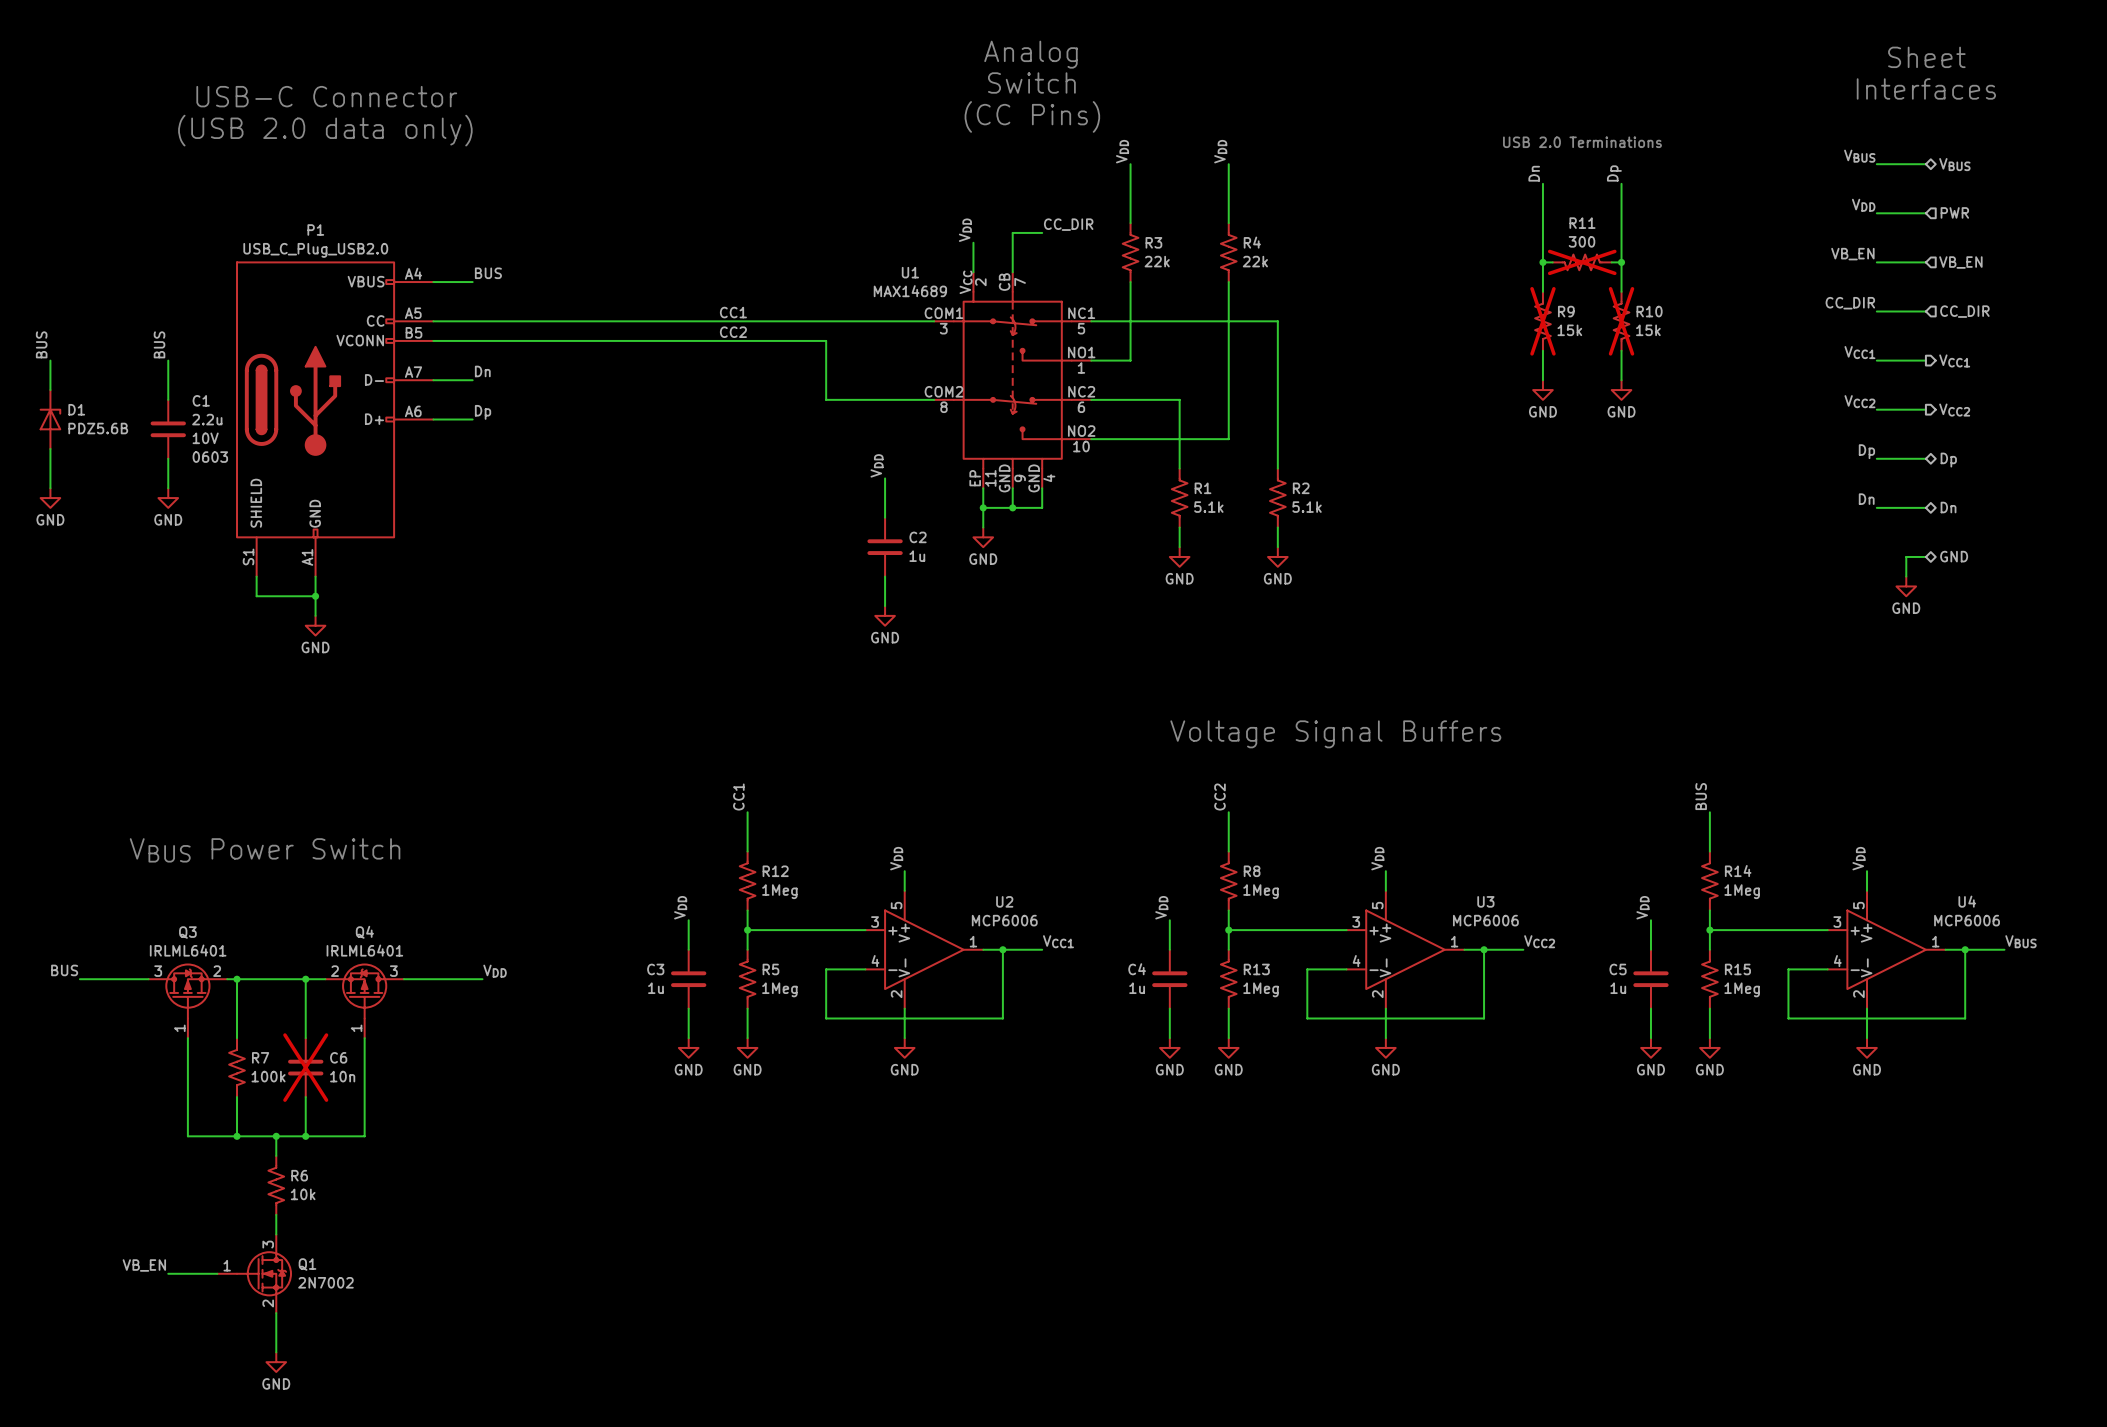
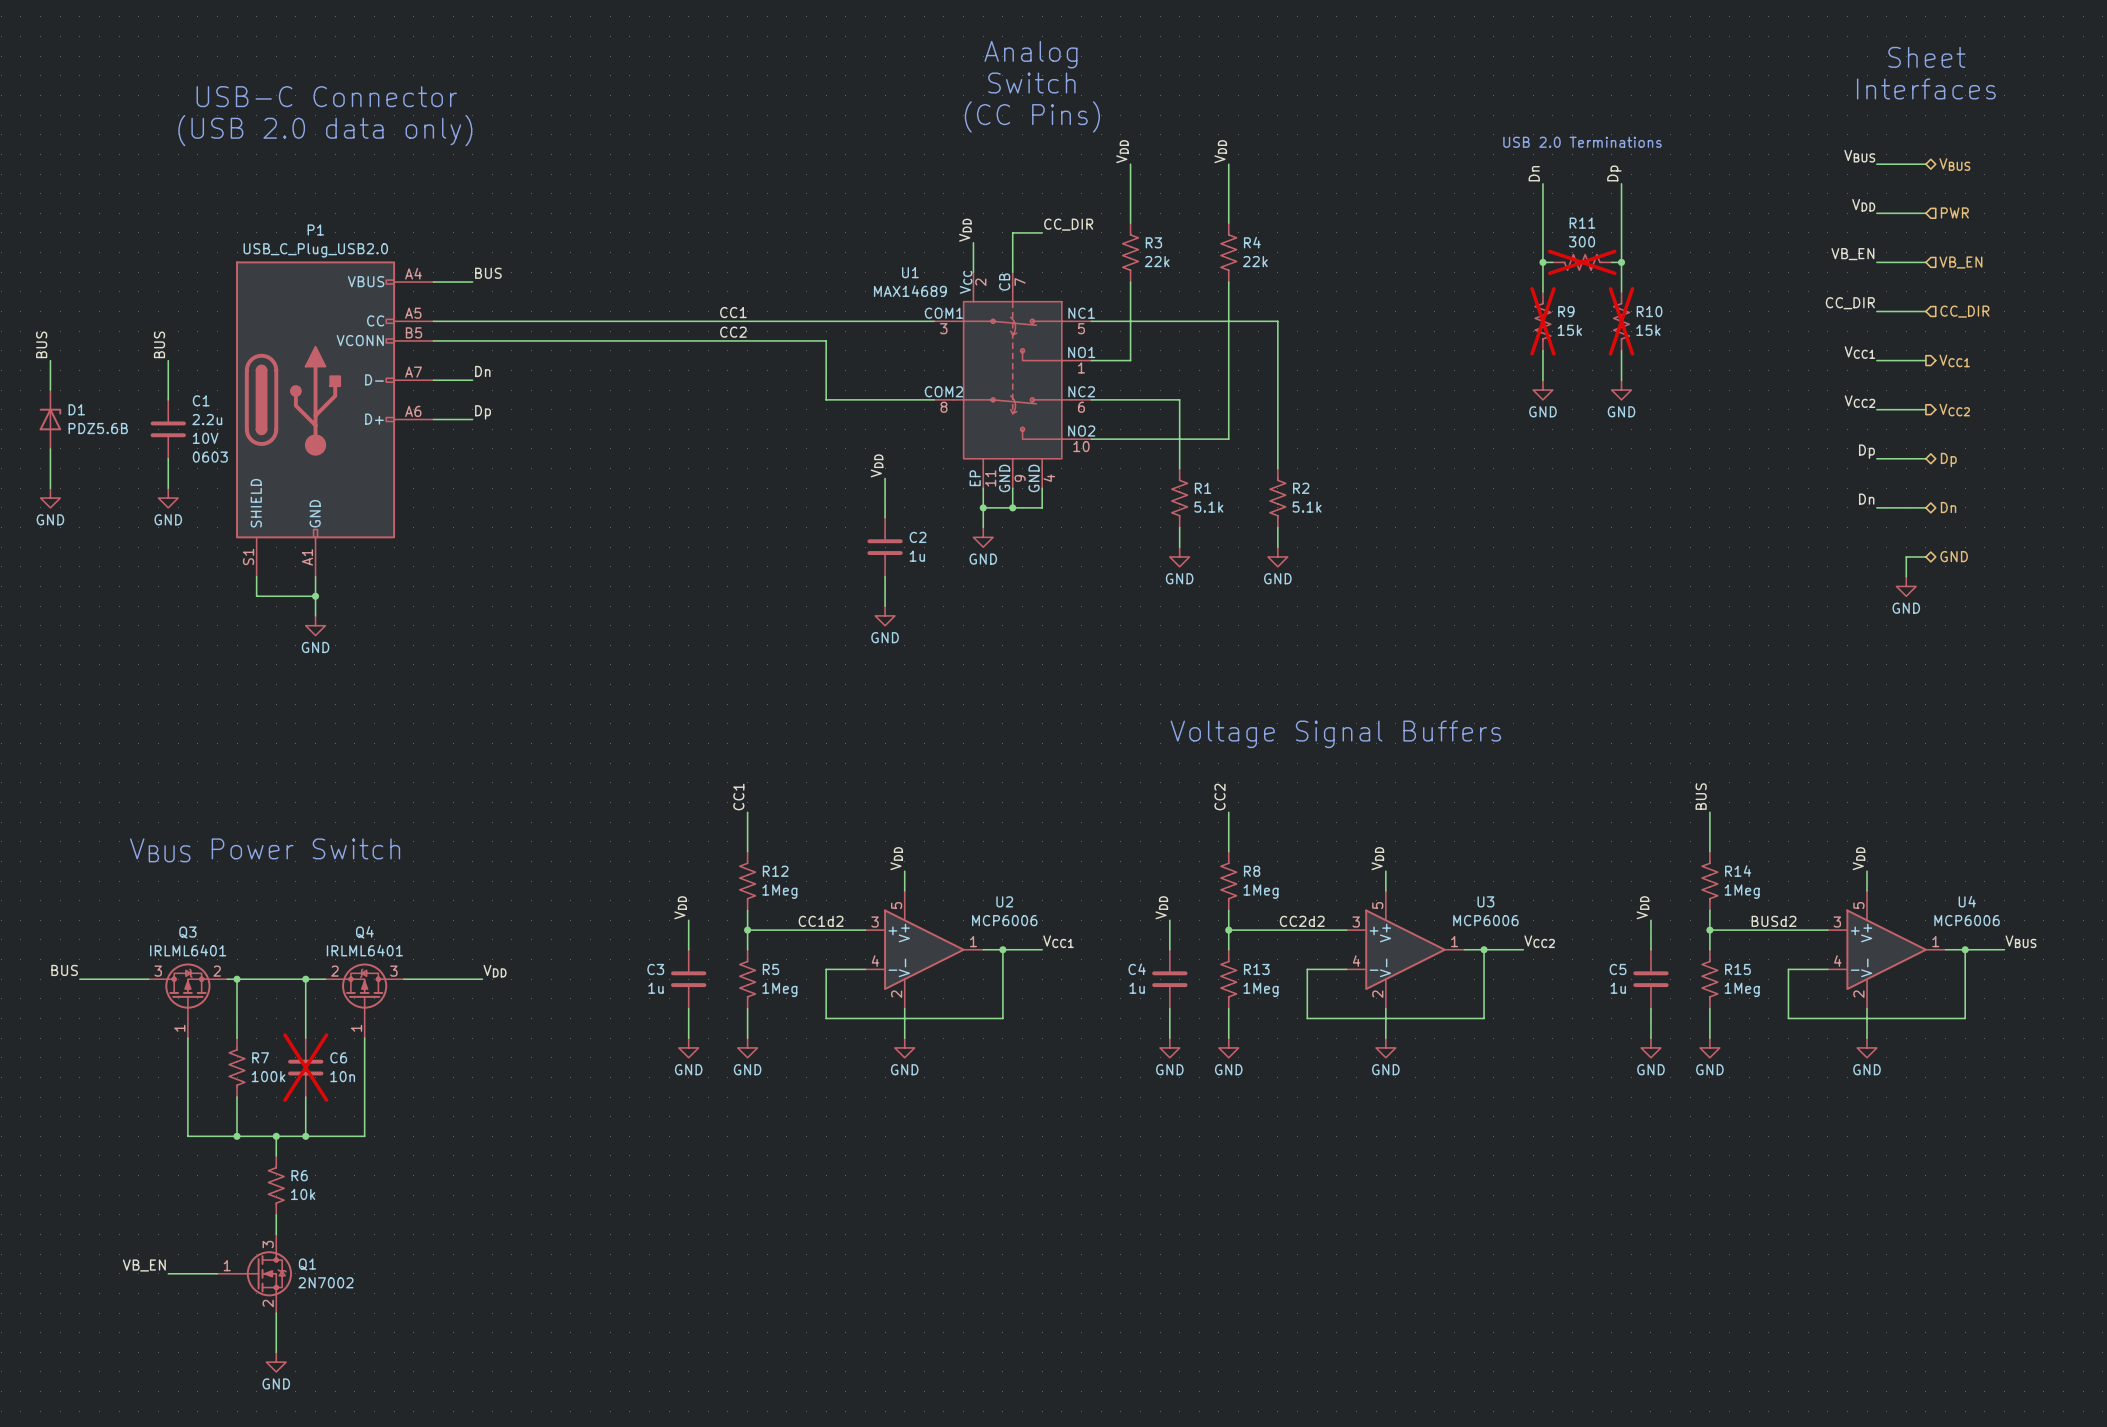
label: none -> CC1d2 (821, 921)
label: none -> CC2d2 (1302, 921)
label: none -> BUSd2 (1774, 921)

